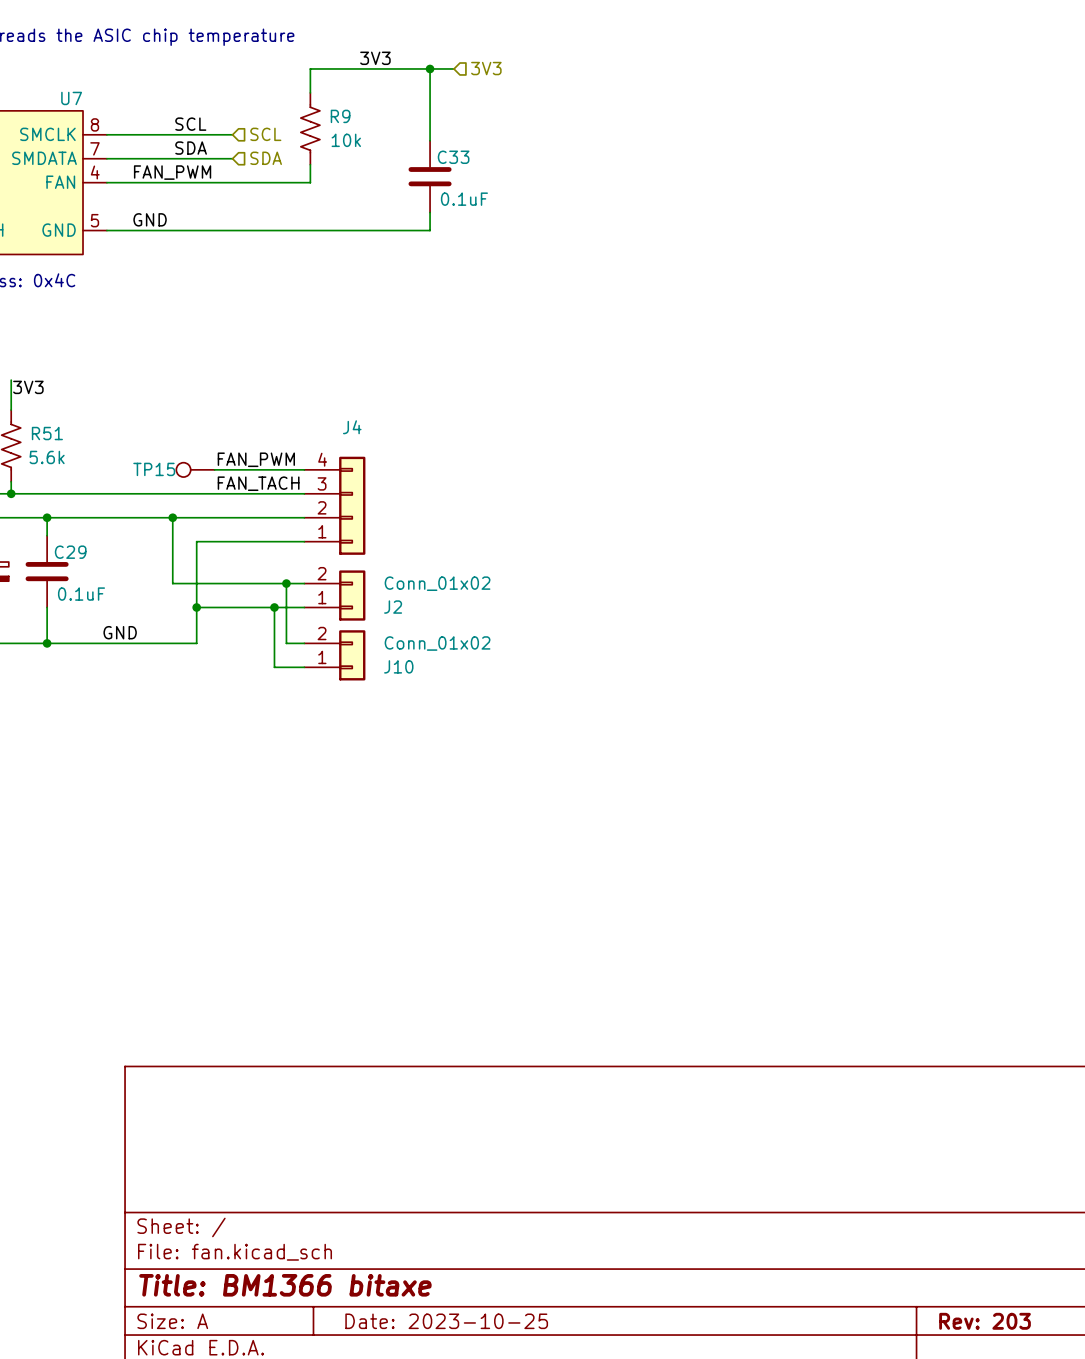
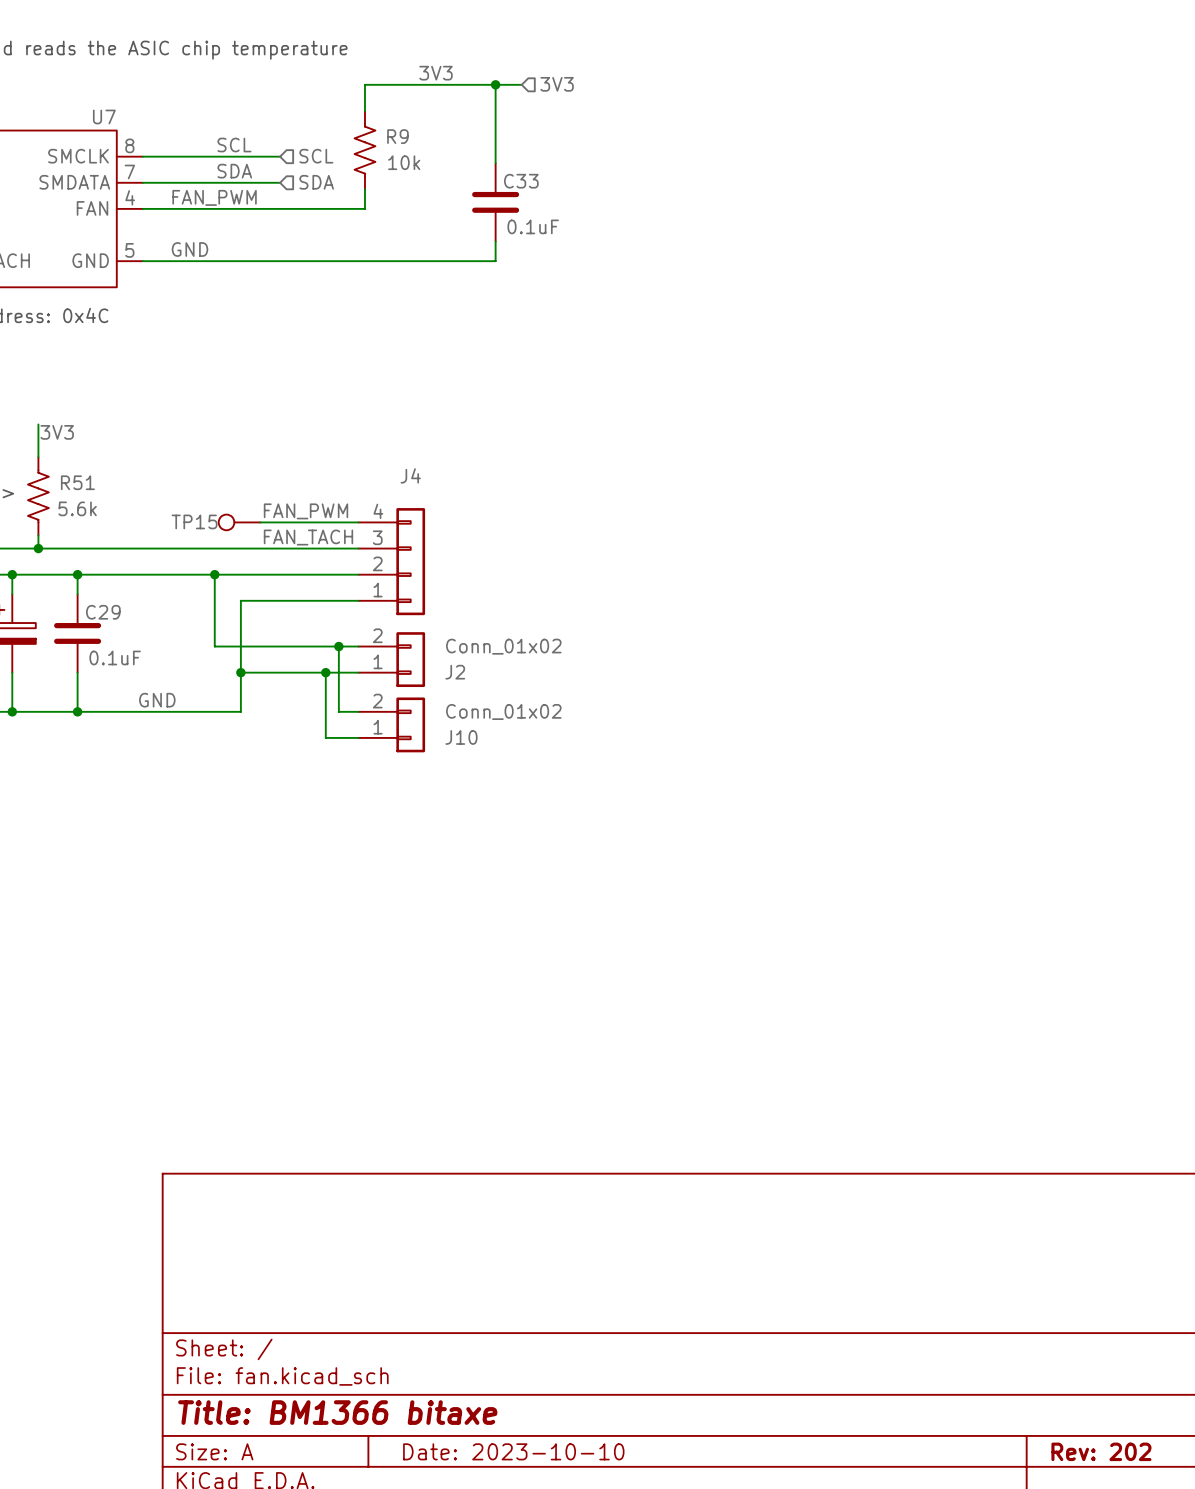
title block: Date: 2023-10-25 (446, 1321) -> Date: 2023-10-10 (513, 1451)
title block: Rev: 203 (985, 1321) -> Rev: 202 (1101, 1451)

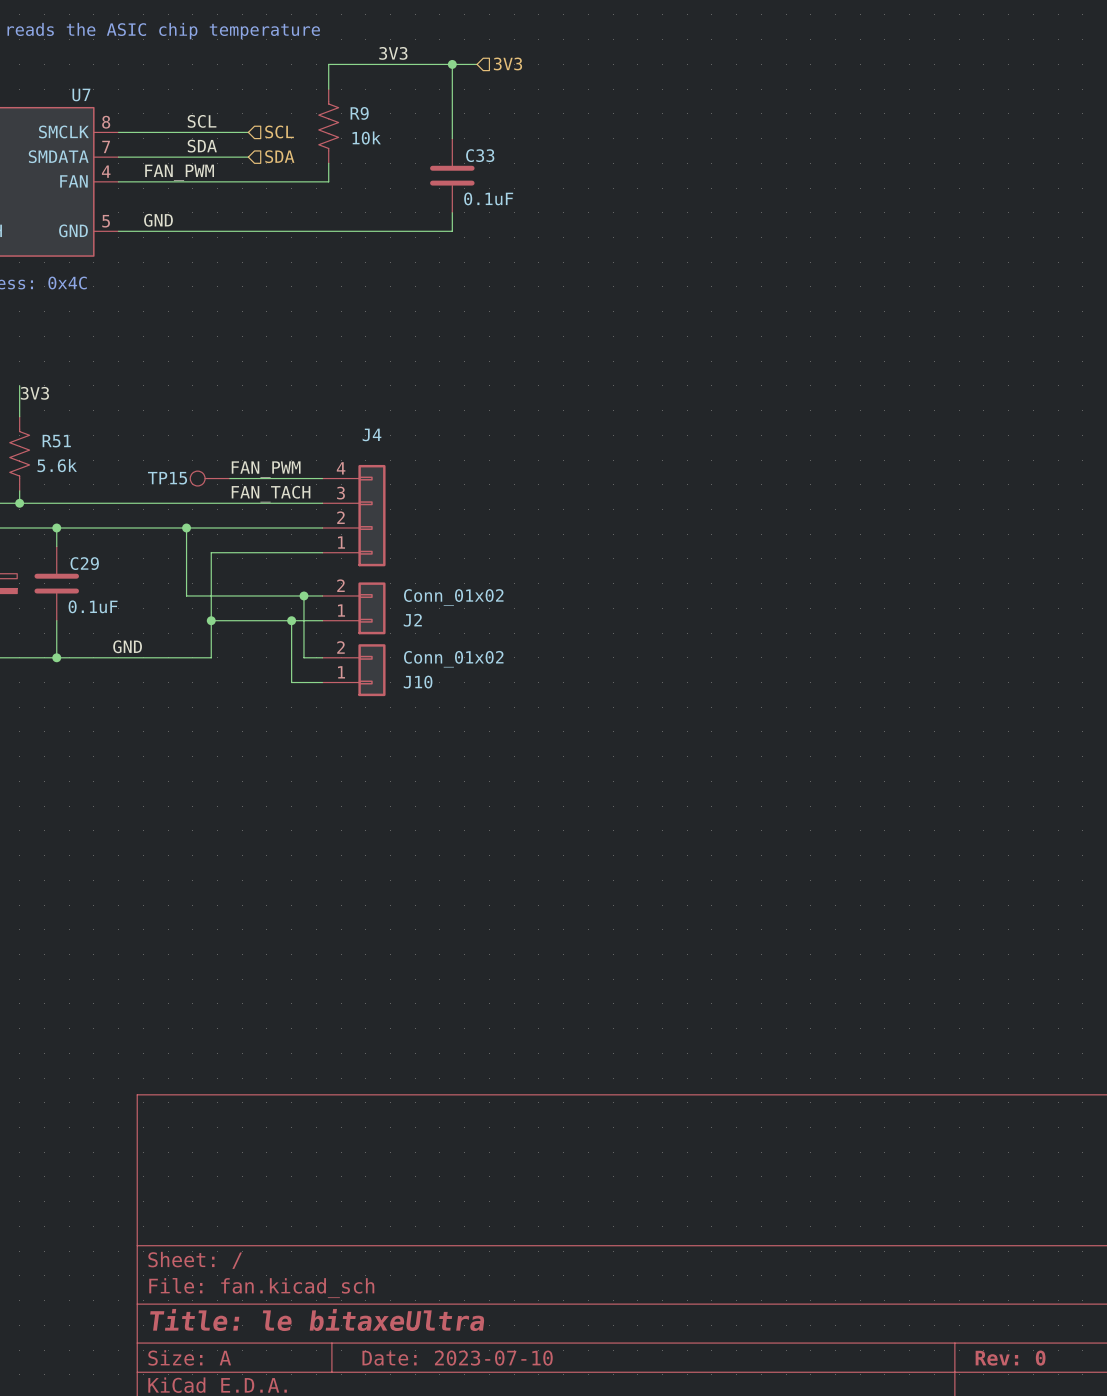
title block: Title: BM1366 bitaxe (337, 1412) -> Title: le bitaxeUltra (317, 1319)
title block: Date: 2023-10-10 (513, 1451) -> Date: 2023-07-10 (457, 1358)
title block: Rev: 202 (1101, 1451) -> Rev: 0 (1010, 1358)

